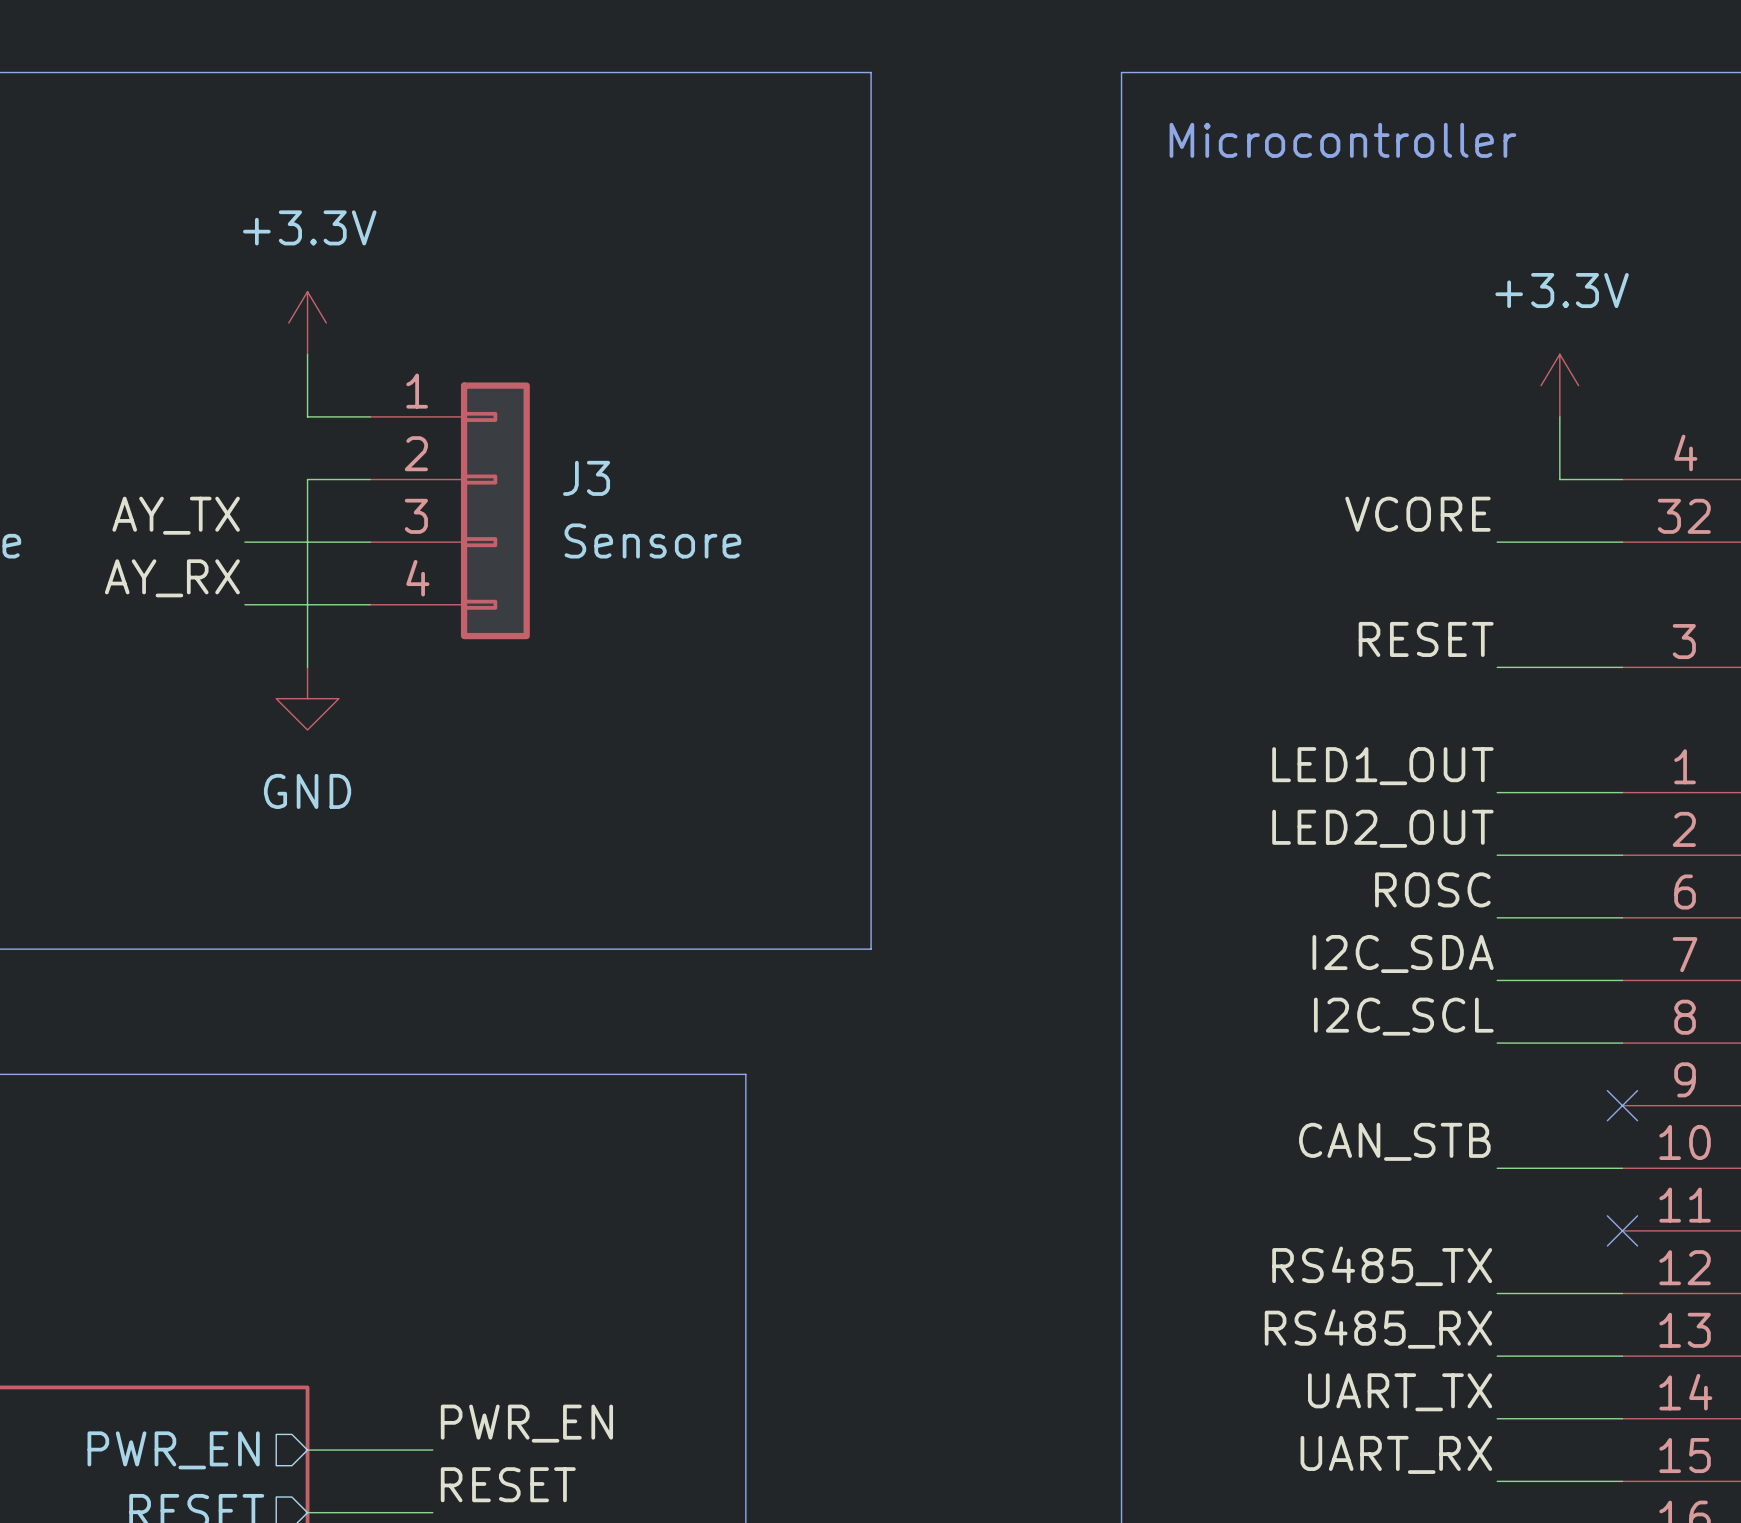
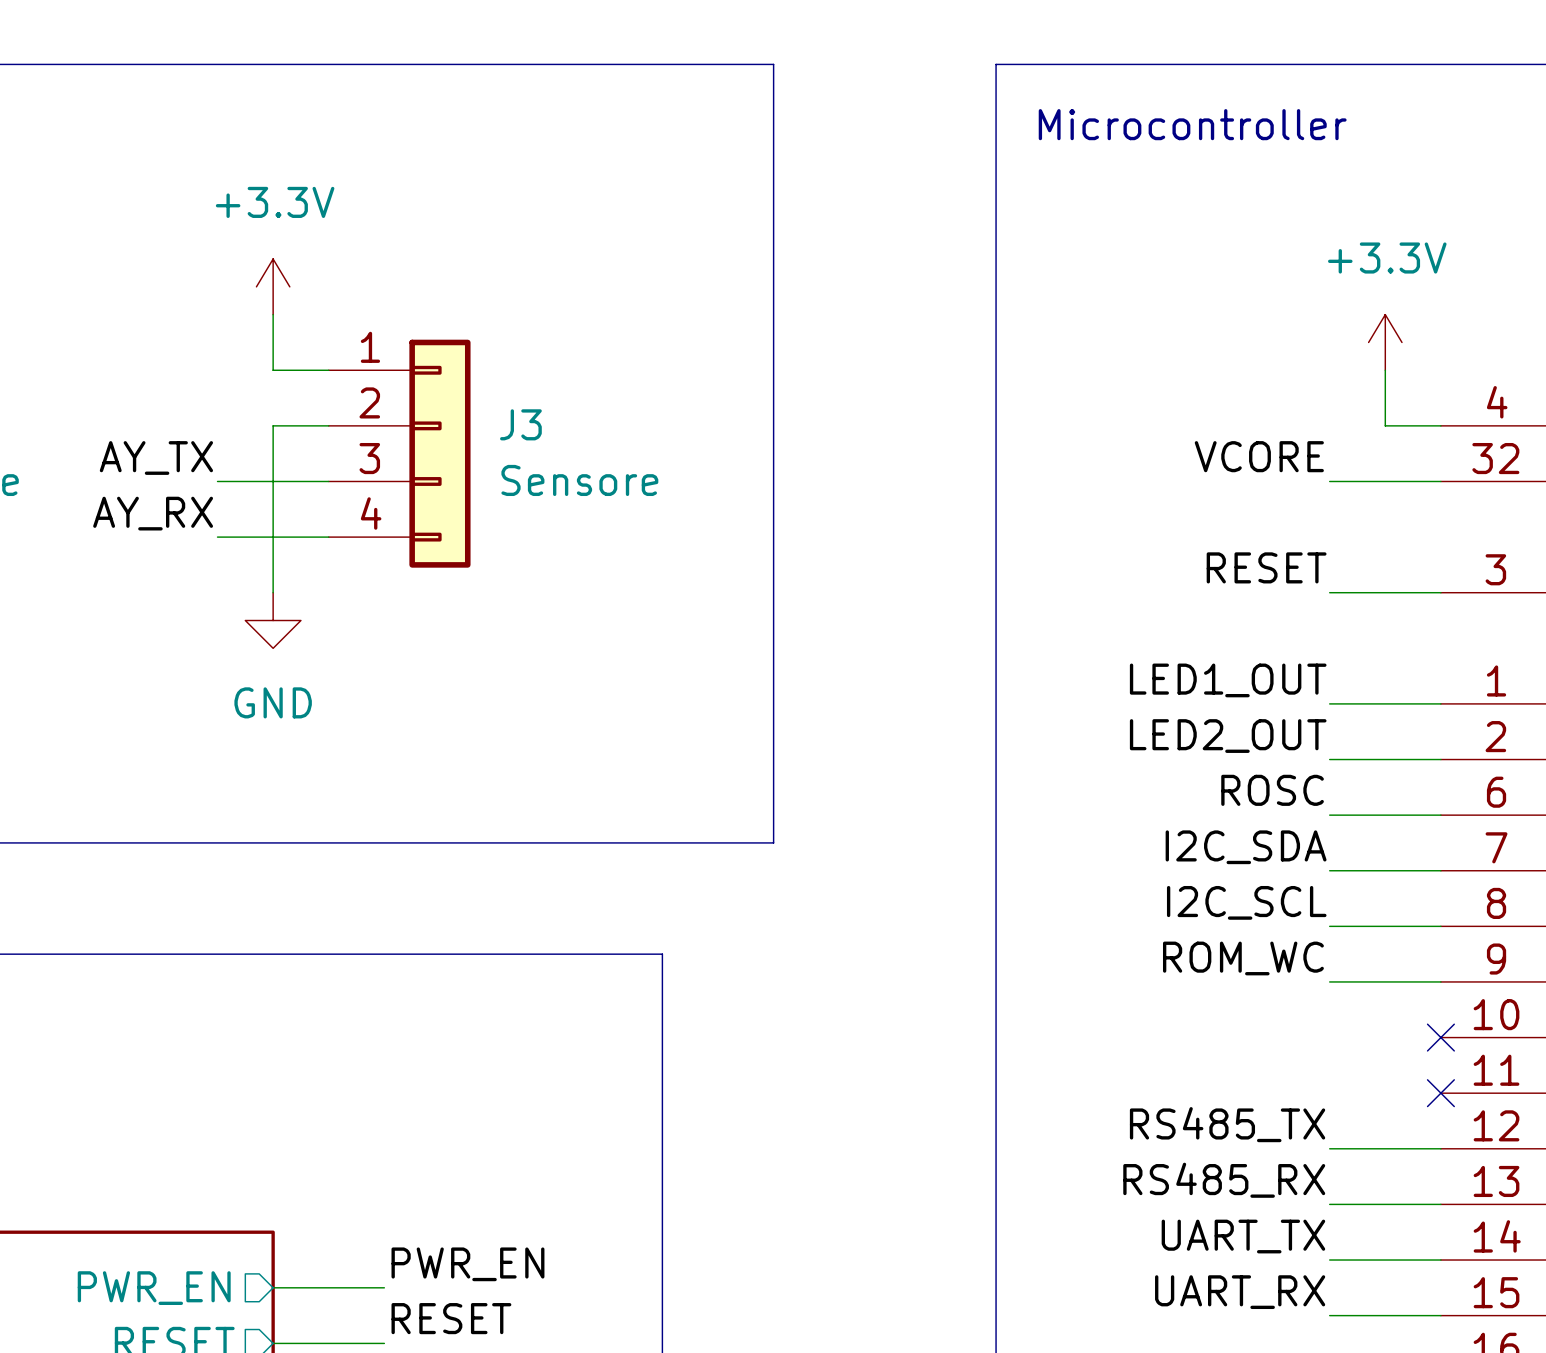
label: none -> ROM_WC (1243, 958)
no-connect mark position: (1622, 1105) -> (1440, 1037)
label: CAN_STB (1394, 1141) -> none
wire: (1497, 1168) (1622, 1168) -> (1329, 981) (1440, 981)

